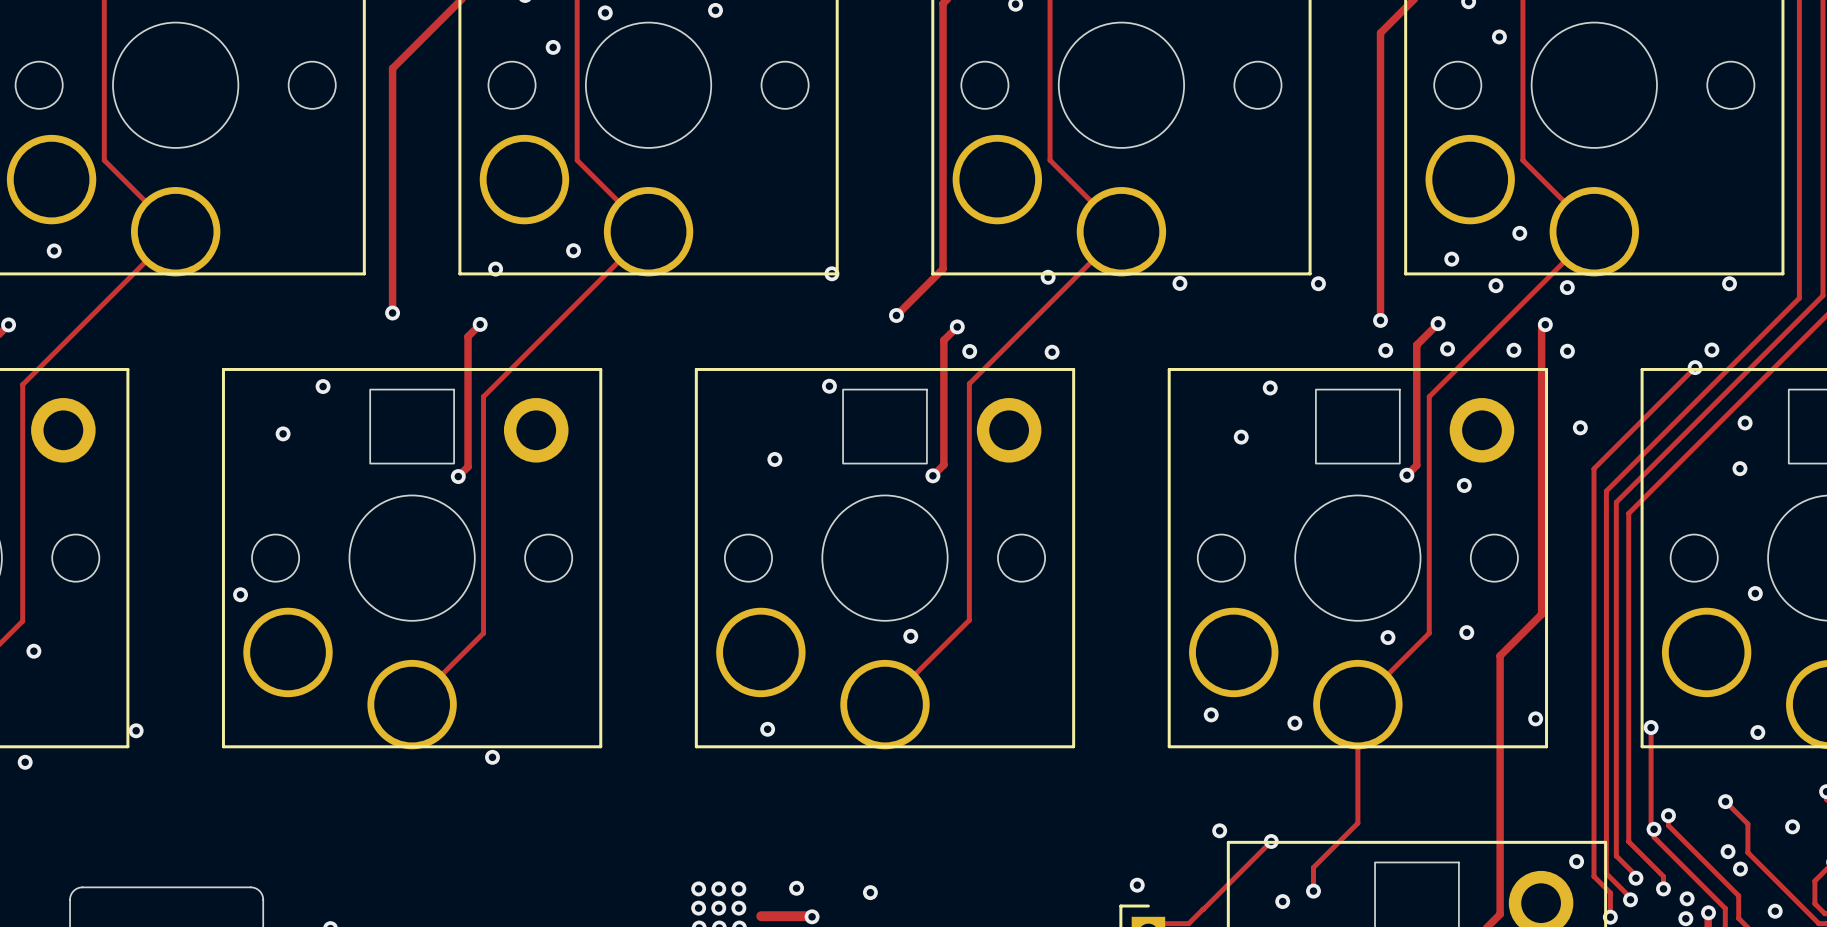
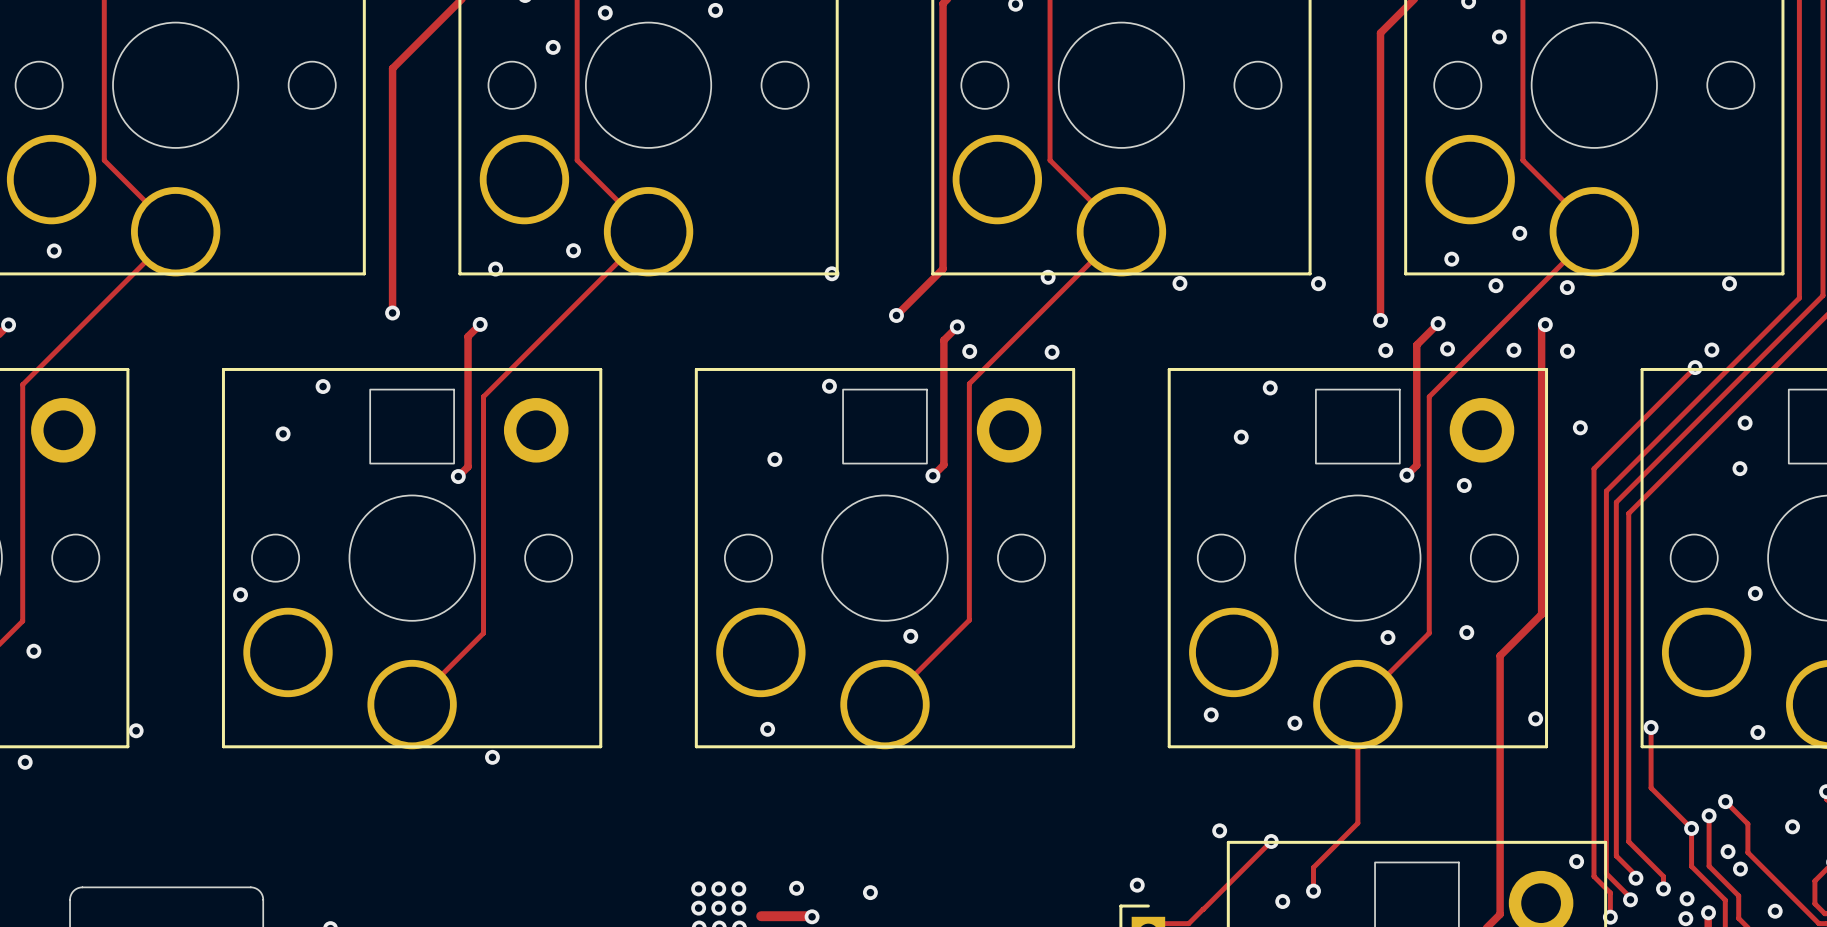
track: (1651, 787) (1651, 826) (1654, 829) (1654, 837) (1725, 908) -> (1651, 787) (1691, 828) (1691, 866) (1725, 900) (1725, 908)
track: (1668, 815) (1668, 825) (1709, 866) -> (1709, 815) (1709, 866)
via: (1668, 815) -> none
via: none -> (1709, 815)
via: none -> (1691, 828)
via: (1654, 829) -> none

